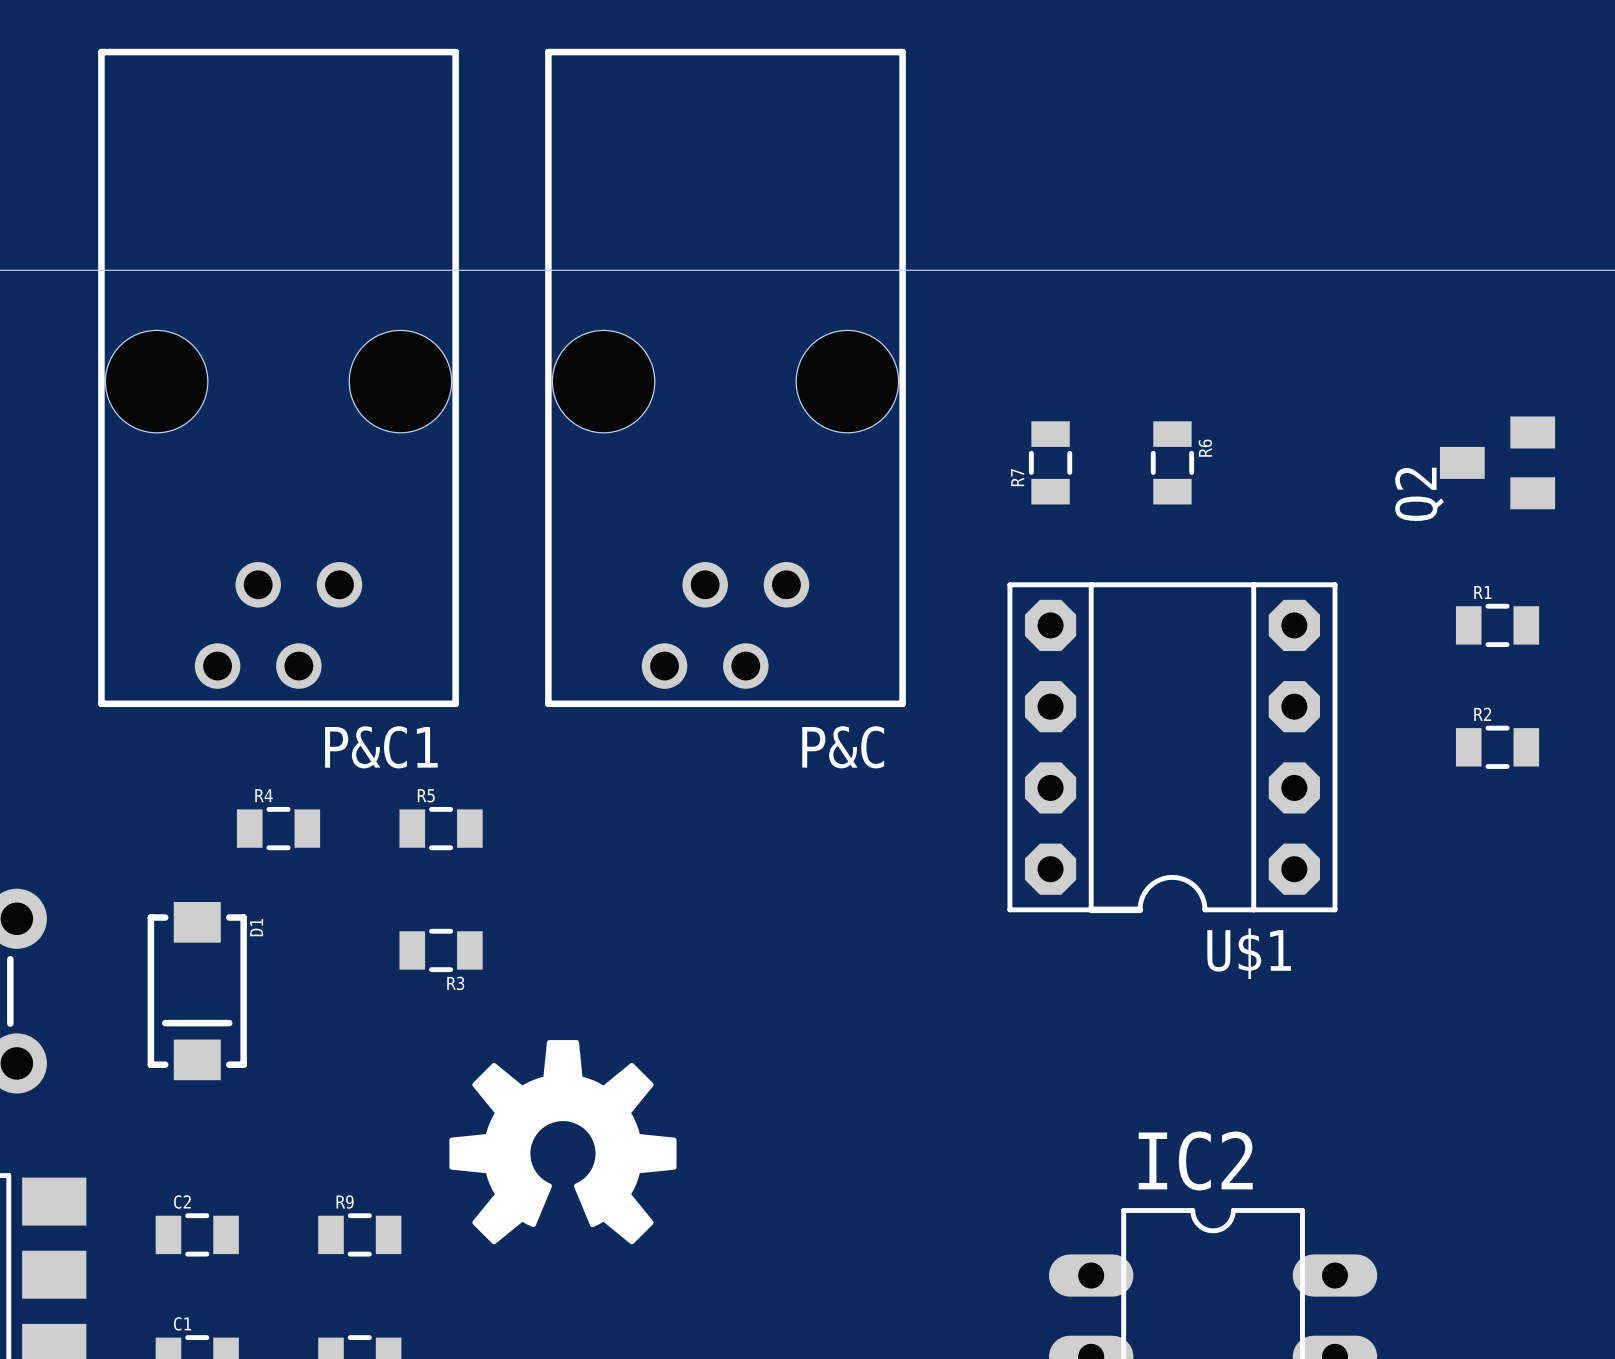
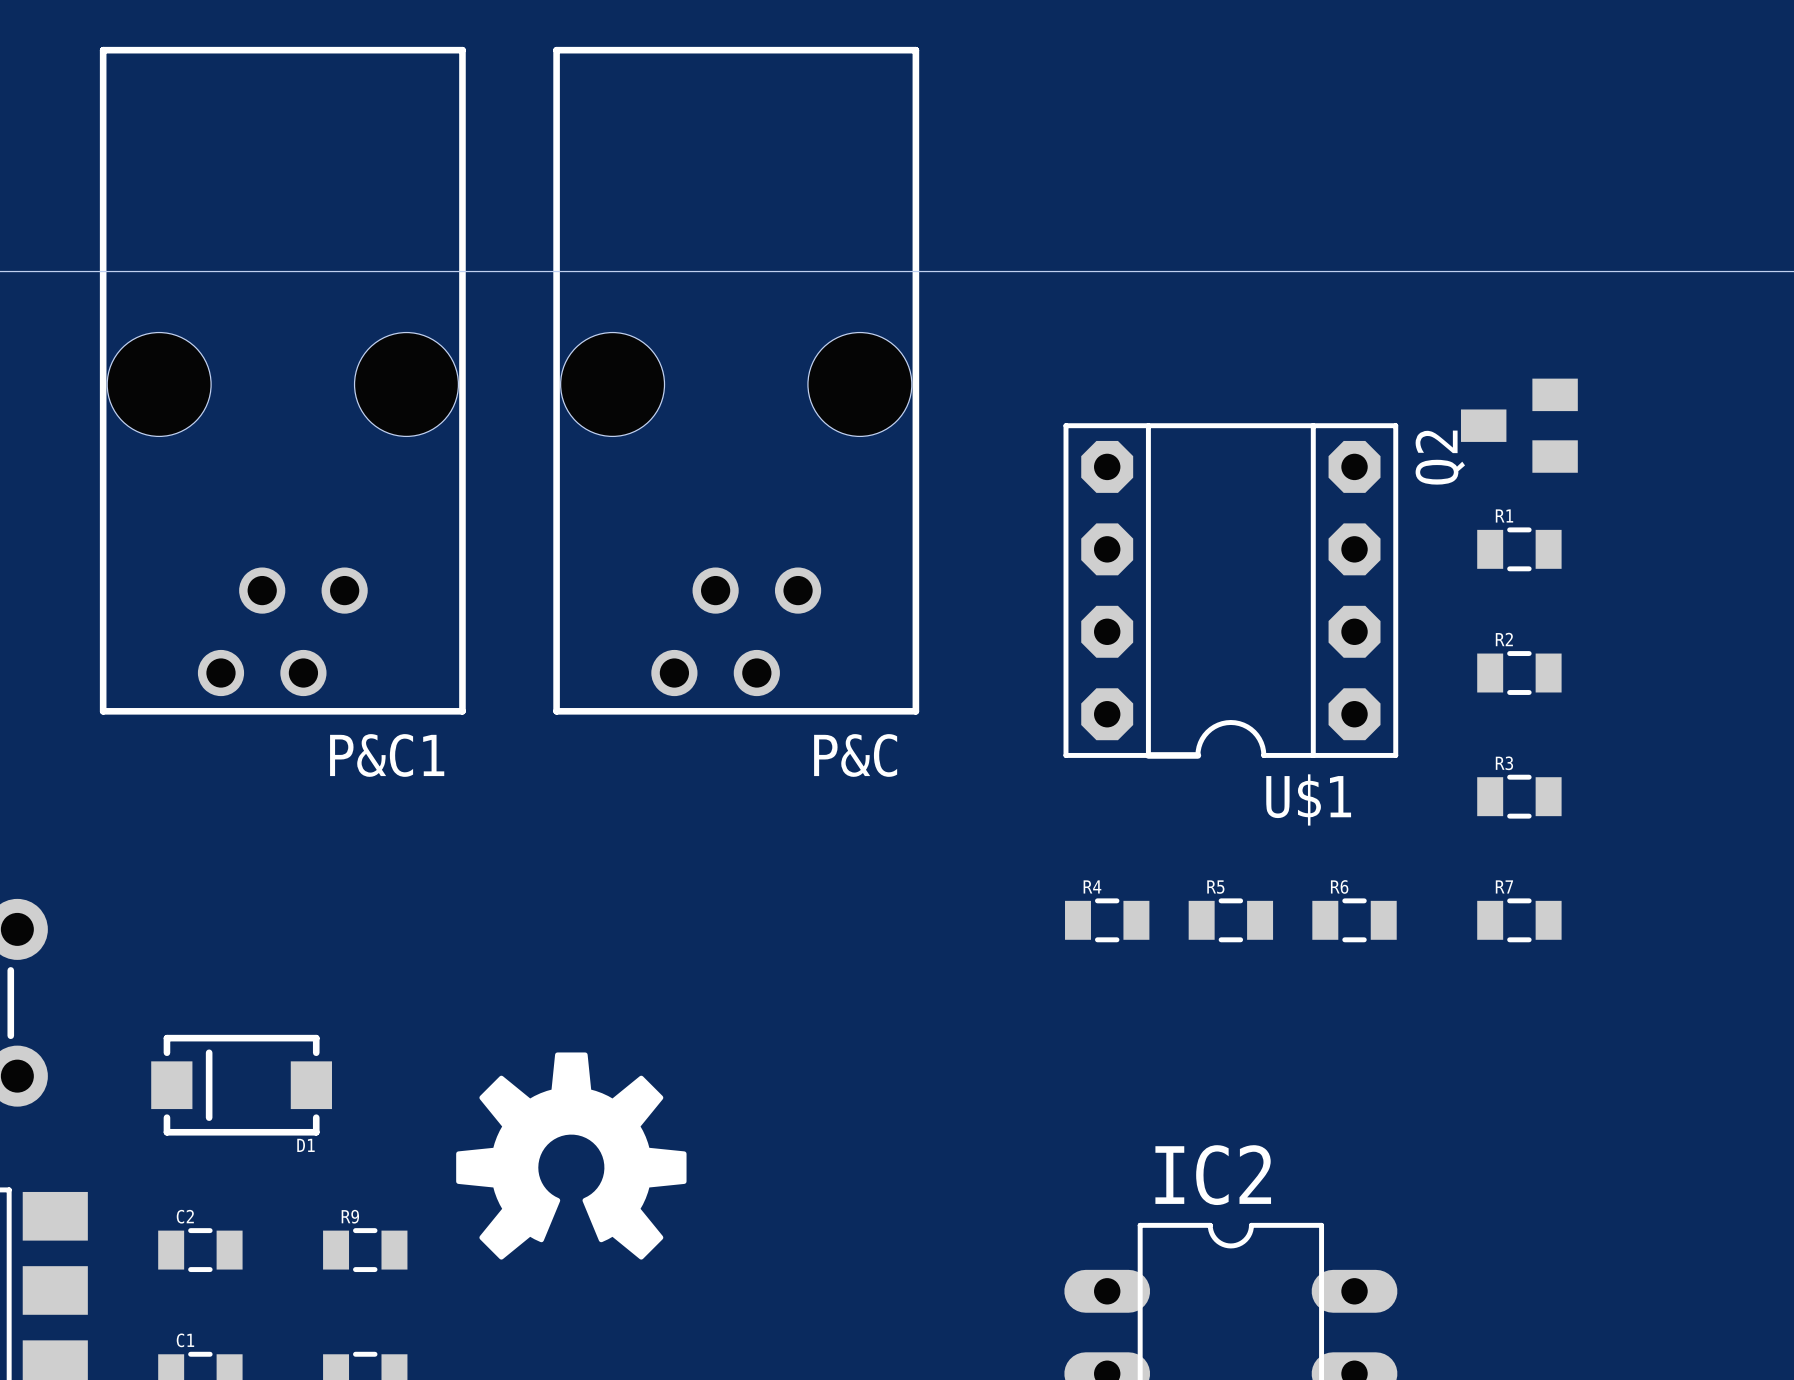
R7 rotation: 0° (1050, 462) -> 90° clockwise (1519, 920)
R7 position: (1050, 462) -> (1519, 920)
R6 rotation: 0° (1172, 462) -> 90° clockwise (1354, 920)
R6 position: (1172, 462) -> (1354, 920)
Q2 position: (1497, 462) -> (1519, 425)
R1 position: (1497, 625) -> (1519, 549)
U$1 position: (1172, 747) -> (1230, 590)
R2 position: (1497, 747) -> (1519, 673)
R4 position: (278, 828) -> (1107, 920)
R5 position: (441, 828) -> (1230, 920)
R3 position: (441, 950) -> (1519, 796)
R3 name position: R3 (455, 983) -> R3 (1504, 763)
D1 rotation: 0° (197, 991) -> 90° clockwise (241, 1085)

